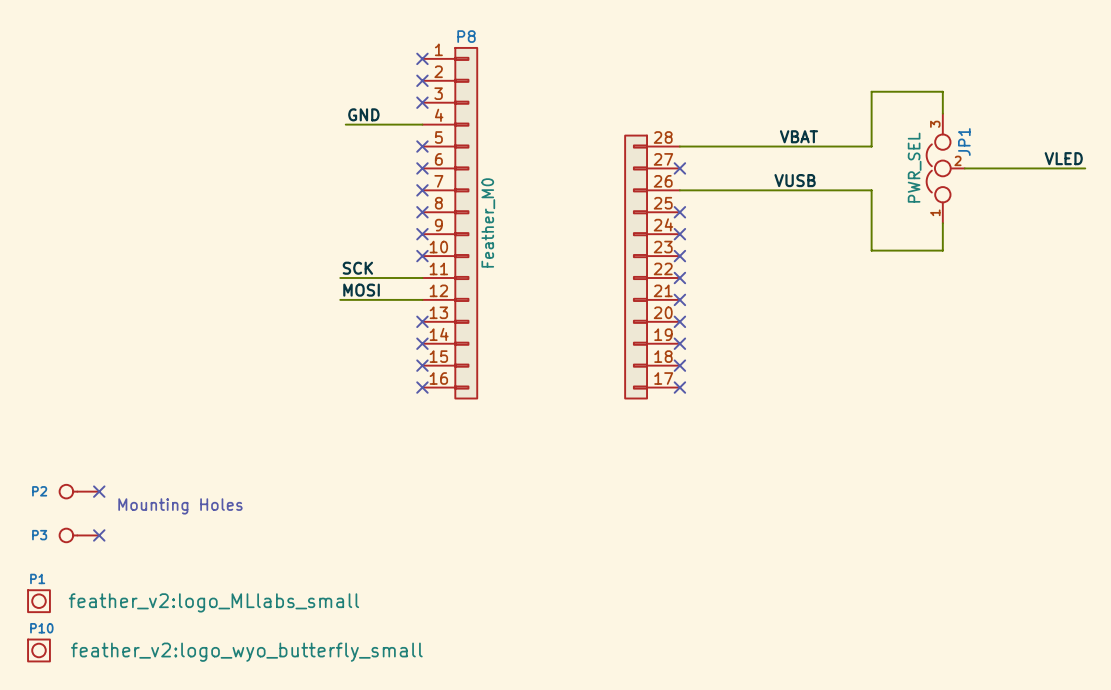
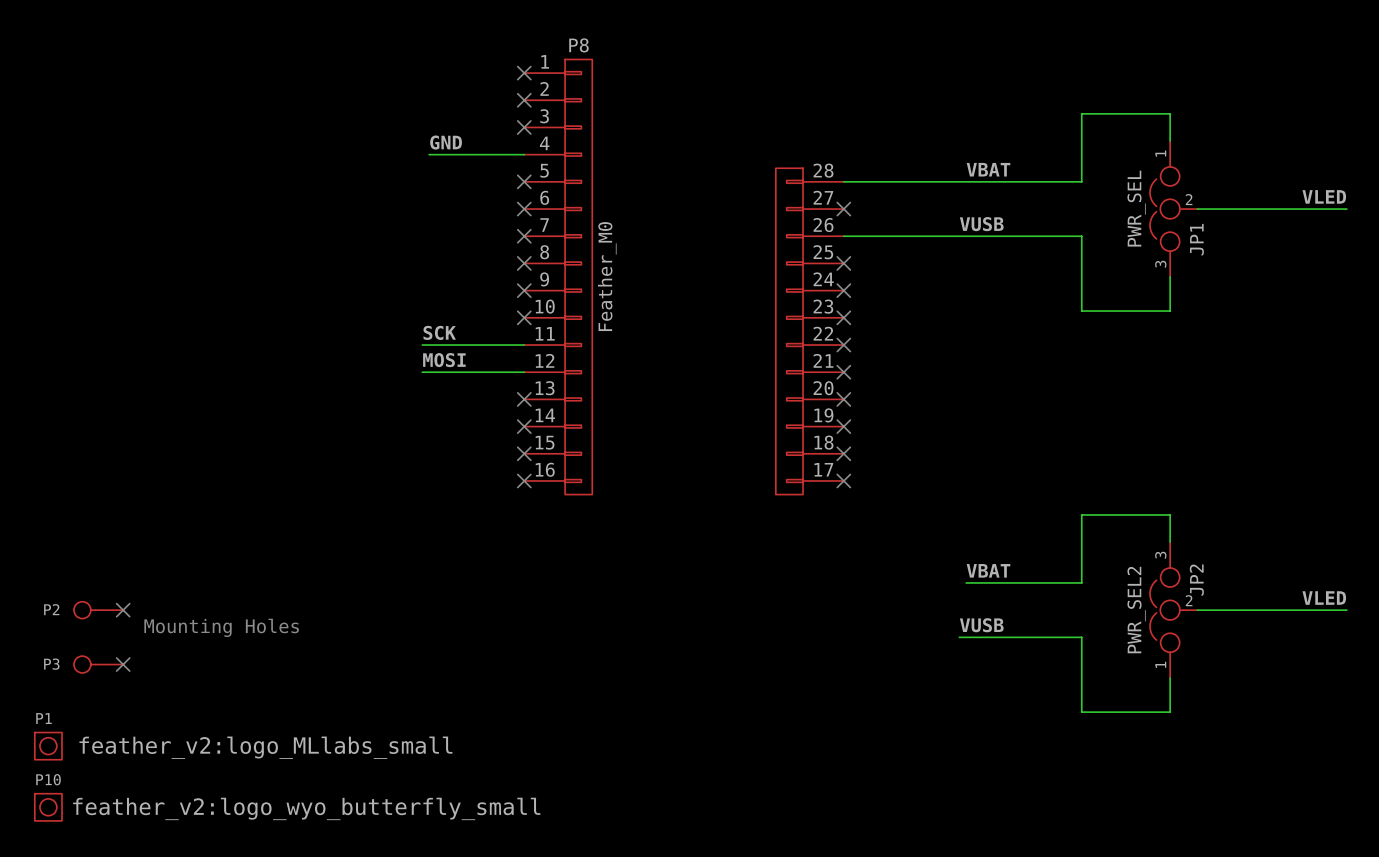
JP1 flip: as is (938, 168) -> up-down (1164, 209)
wire: none -> (1170, 542) (1170, 514) (1081, 514) (1081, 582) (966, 582)
label: none -> VBAT (988, 570)
label: none -> VLED (1324, 598)
JP2: none -> PWR_SEL2 (1173, 610)
wire: none -> (1197, 610) (1346, 610)
label: none -> VUSB (981, 625)
wire: none -> (959, 637) (1081, 637) (1081, 712) (1170, 712) (1170, 678)

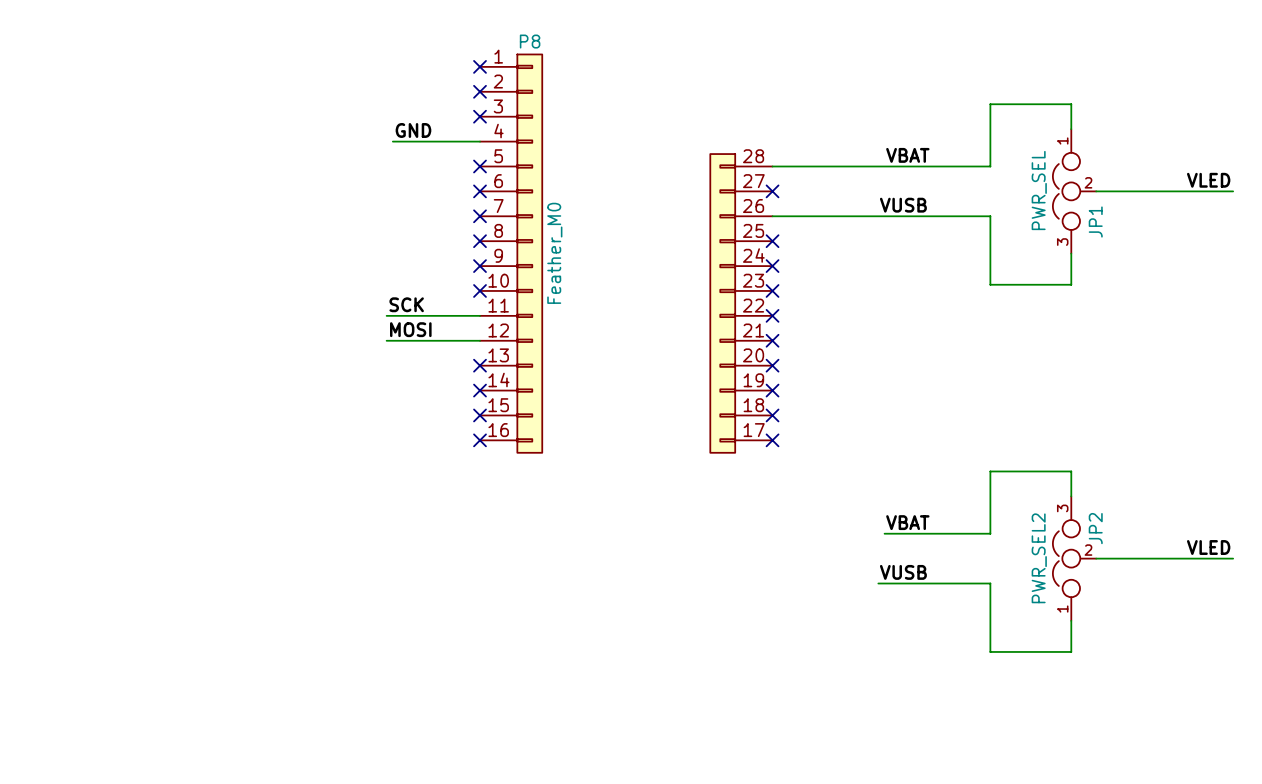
P2: (98, 610) -> none
no-connect mark: (123, 610) -> none
text: Mounting Holes (221, 627) -> none
P3: (98, 664) -> none
no-connect mark: (123, 664) -> none
P1: (48, 746) -> none
P10: (48, 807) -> none

